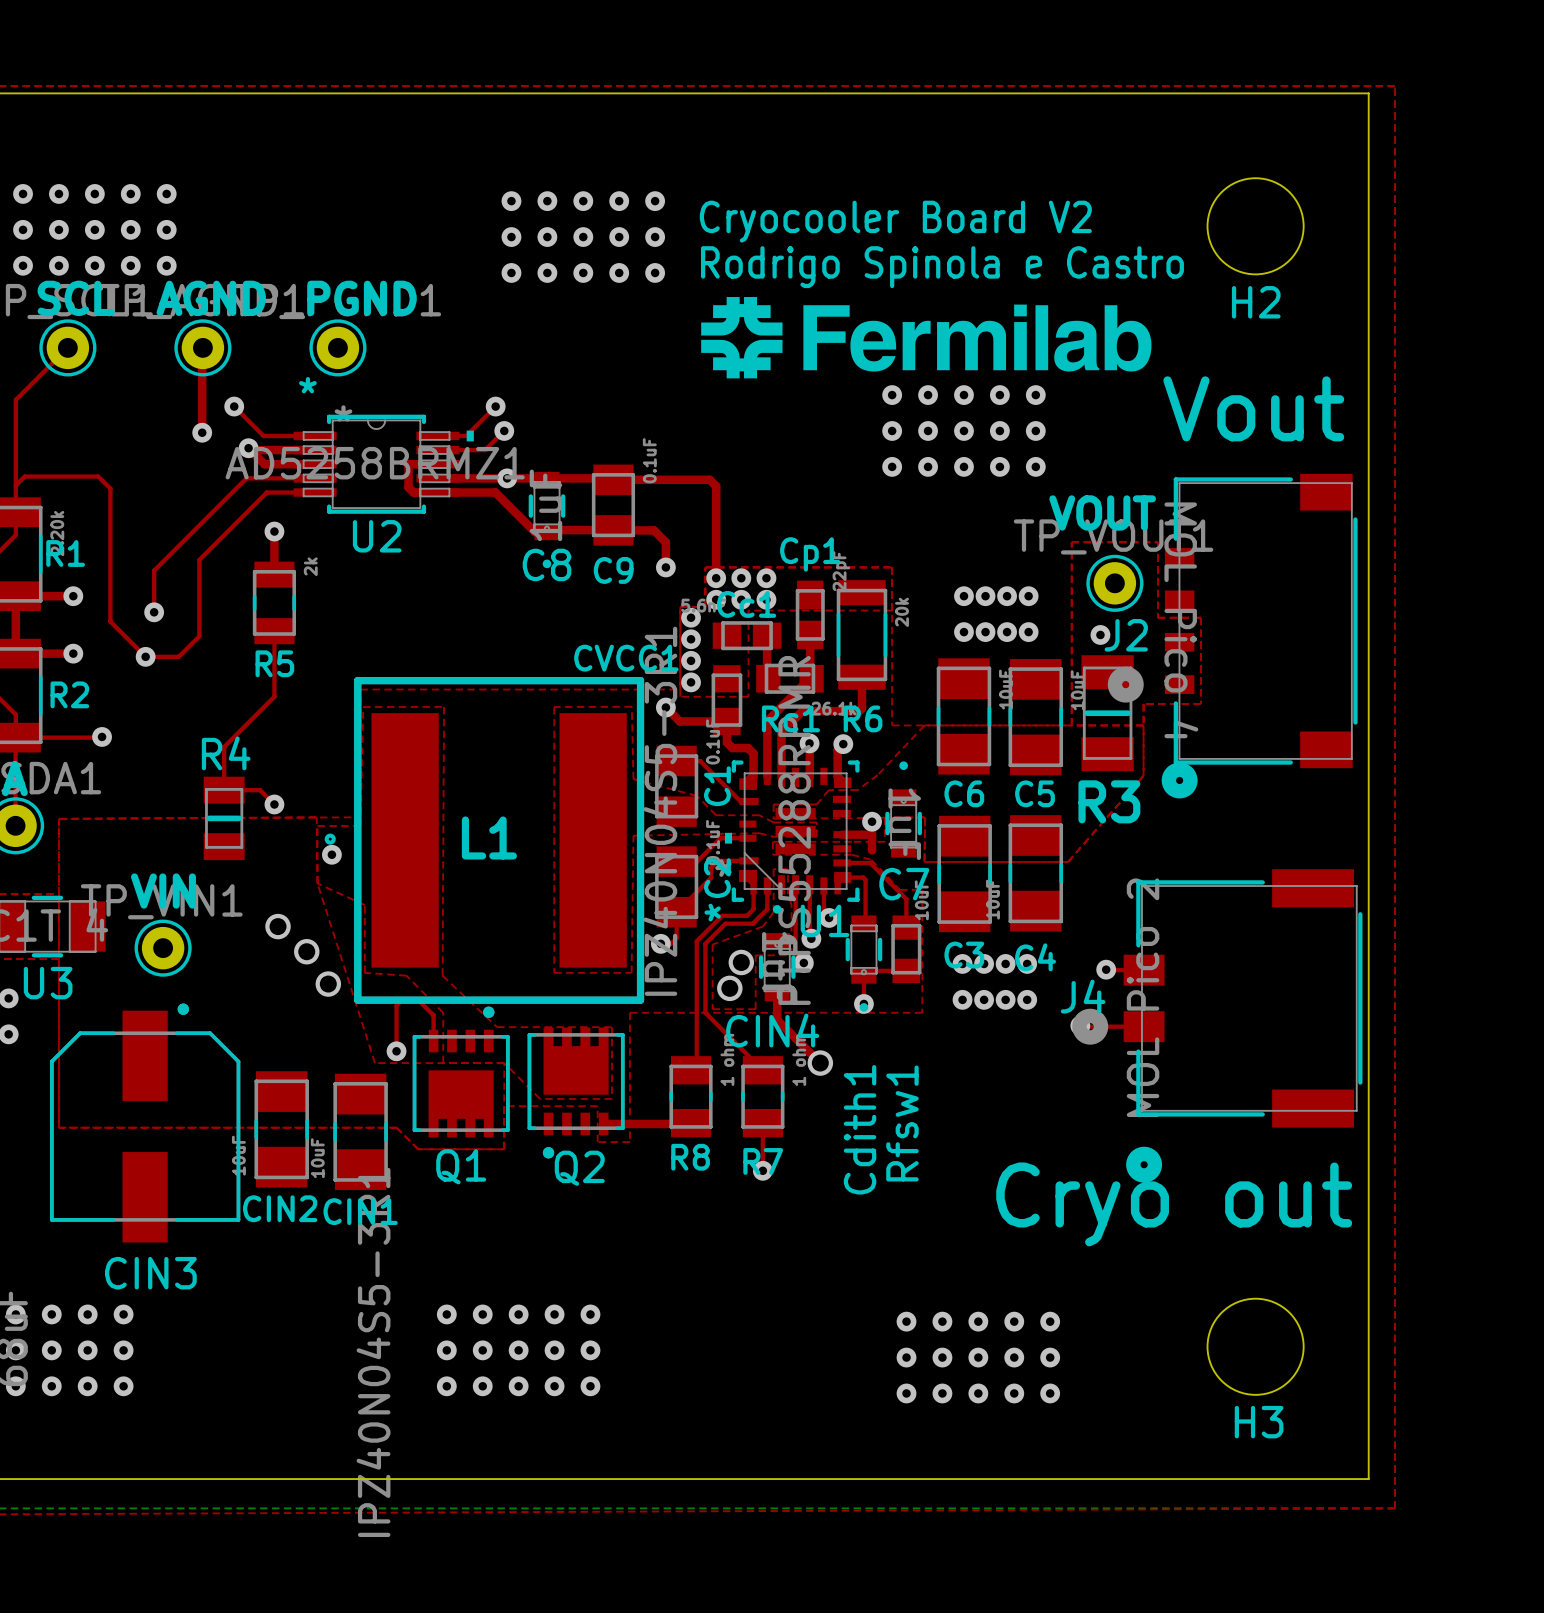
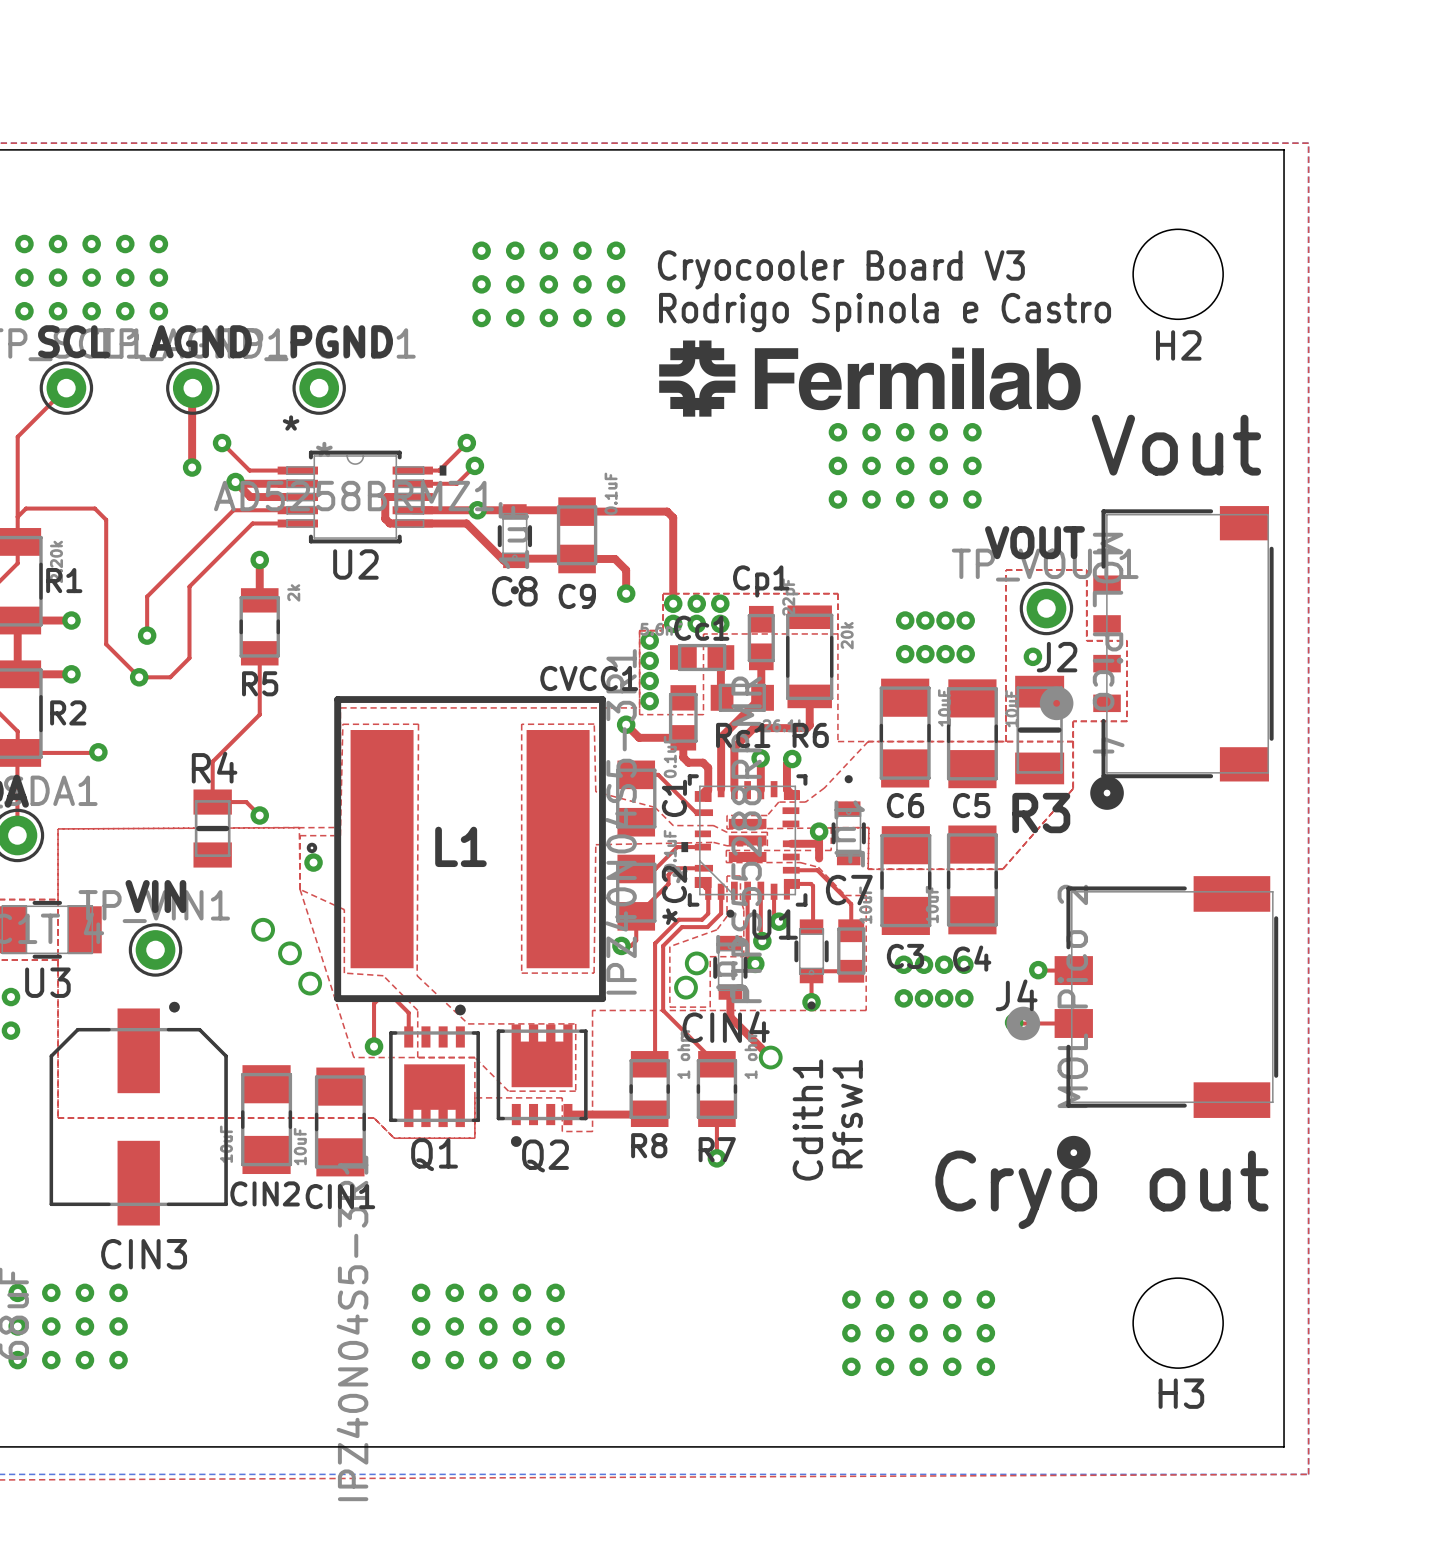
text: Cryocooler Board V2 (895, 221) -> Cryocooler Board V3 (841, 269)

